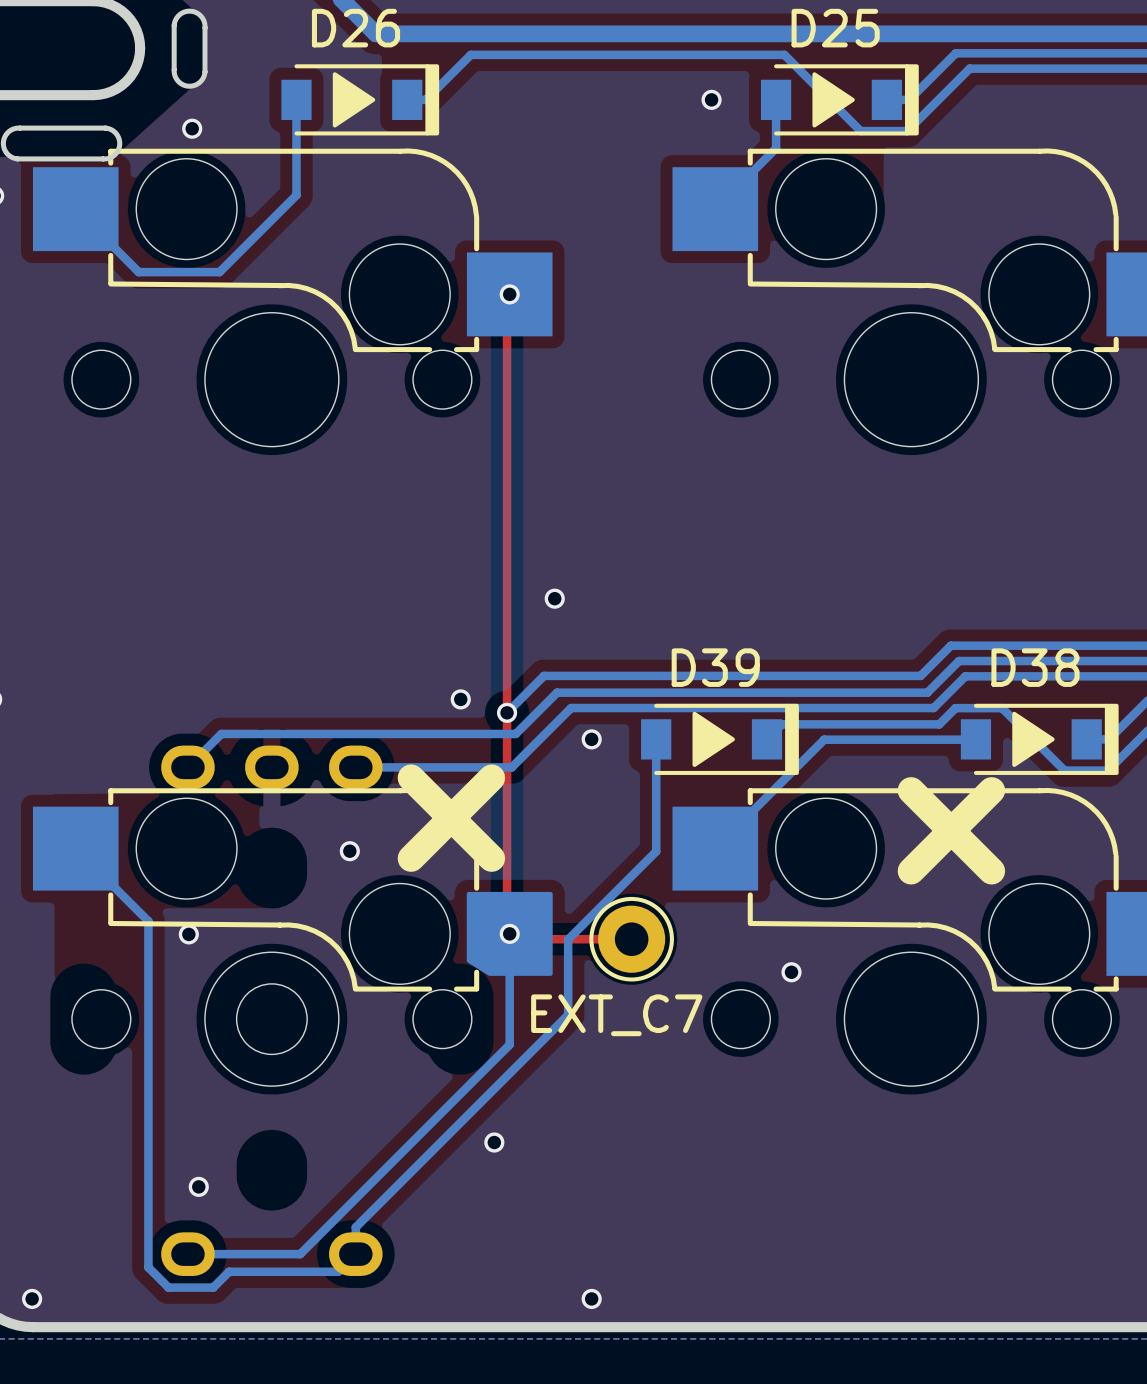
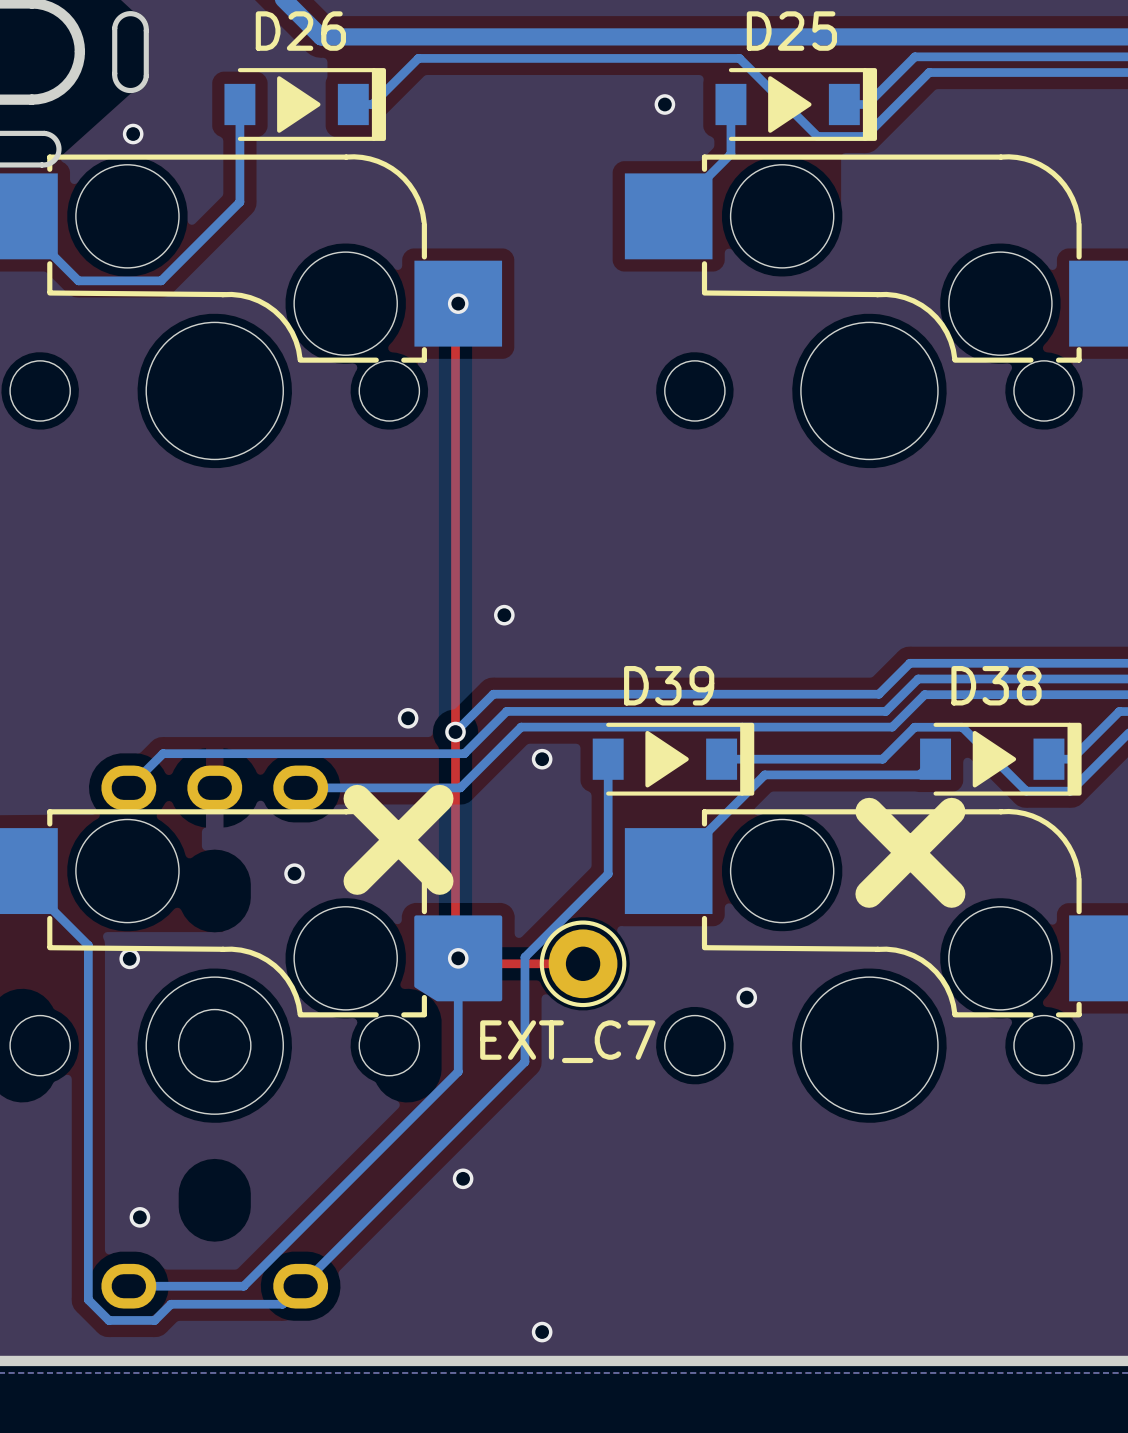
bottom track: (939, 724) (781, 724) (766, 739) -> (898, 743) (882, 759) (721, 759)
bottom track: (975, 739) (824, 739) (809, 754) -> (935, 759) (919, 774) (764, 774)
bottom track: (574, 932) (568, 939) (568, 1014) (355, 1227) (355, 1254) -> (524, 957) (524, 1061) (300, 1286)
via position: (494, 1142) -> (463, 1178)

